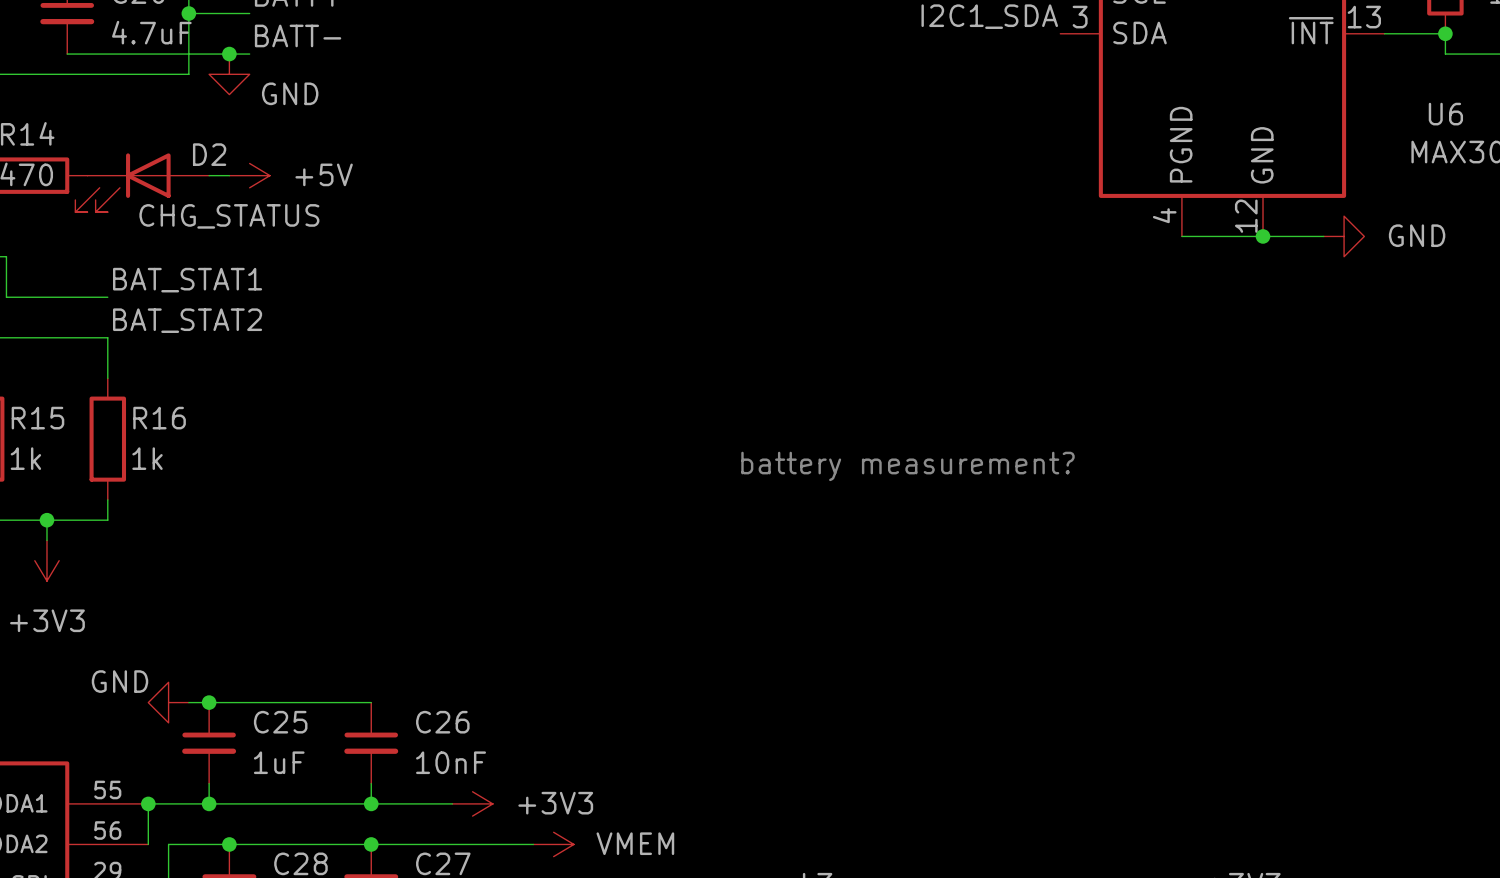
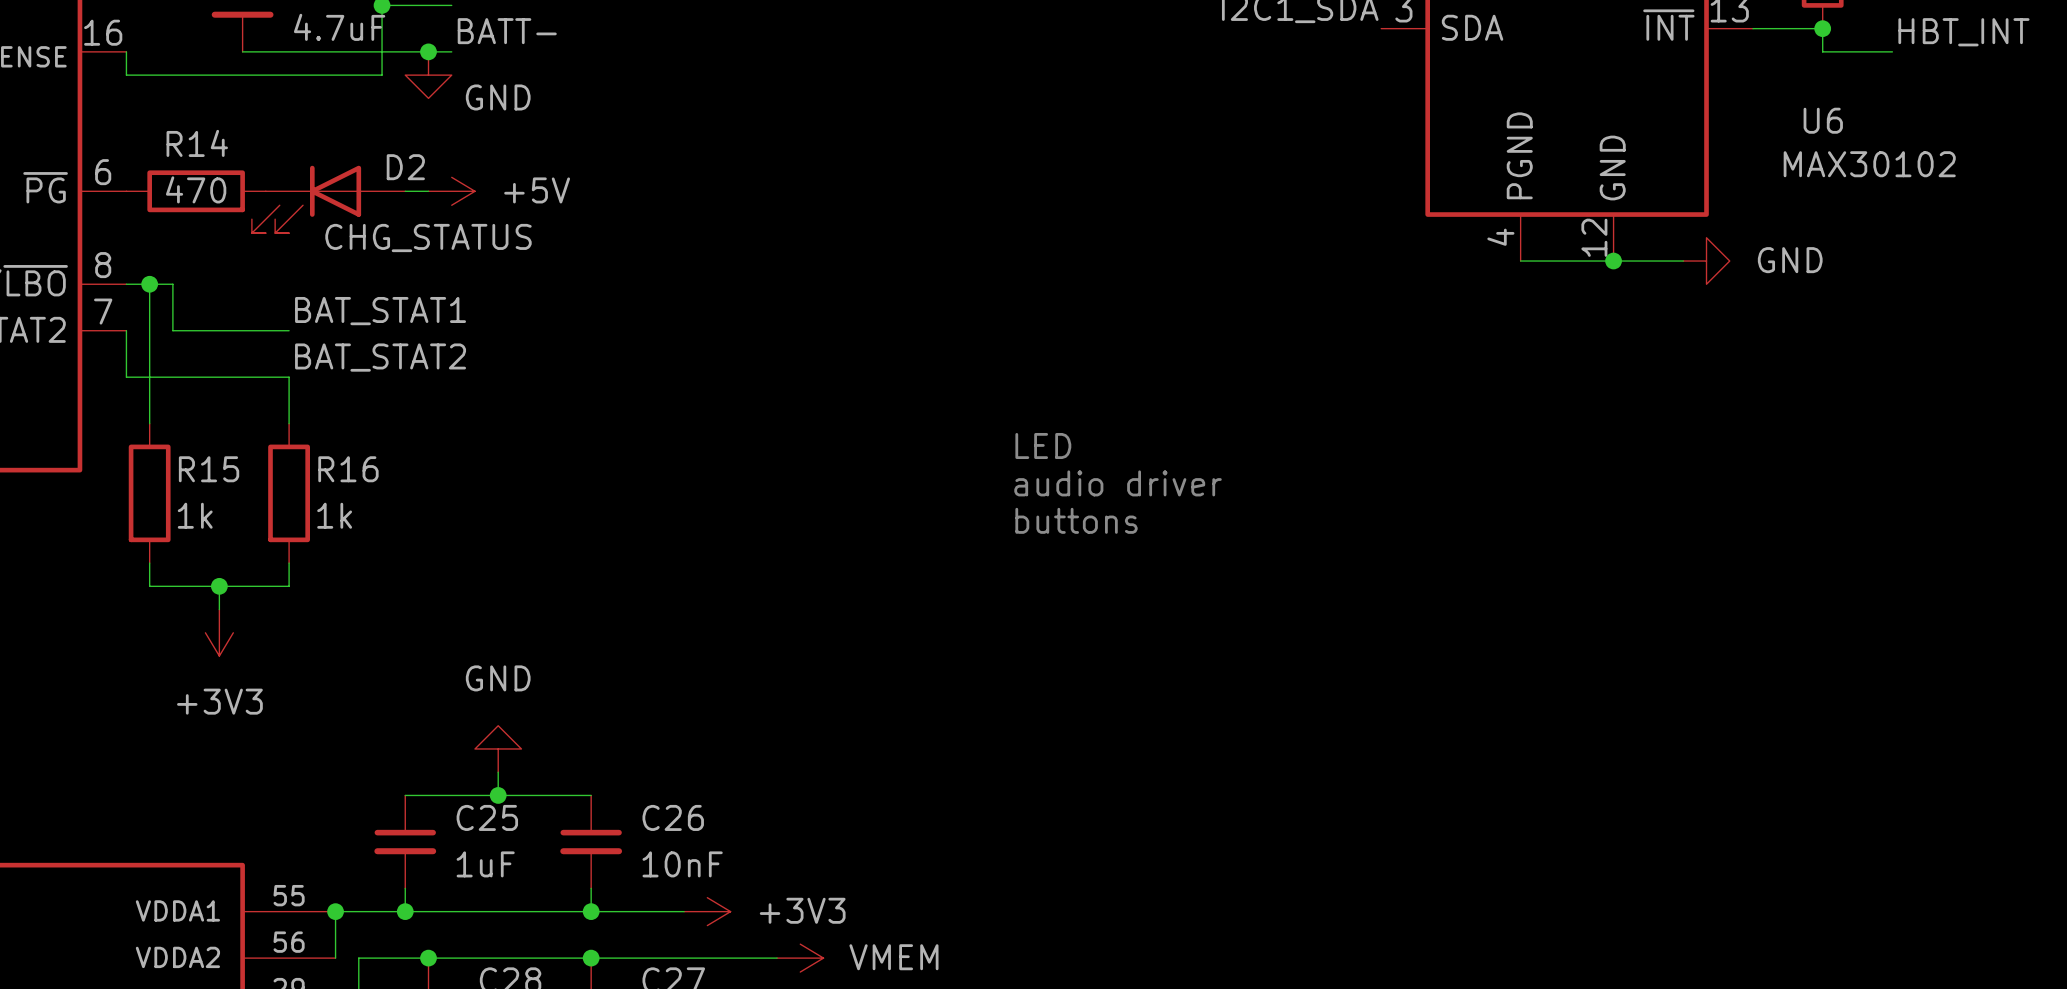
text: none -> LED (1043, 445)
text: none -> audio driver (1118, 483)
text: battery measurement? (908, 466) -> buttons (1076, 520)
wire: none -> (498, 772) (498, 795)
power symbol rotation: 0° (168, 702) -> 90° clockwise (498, 748)
power symbol position: GND (168, 702) -> GND (498, 748)
wire: (188, 702) (209, 702) -> none
junction position: (209, 702) -> (498, 795)

